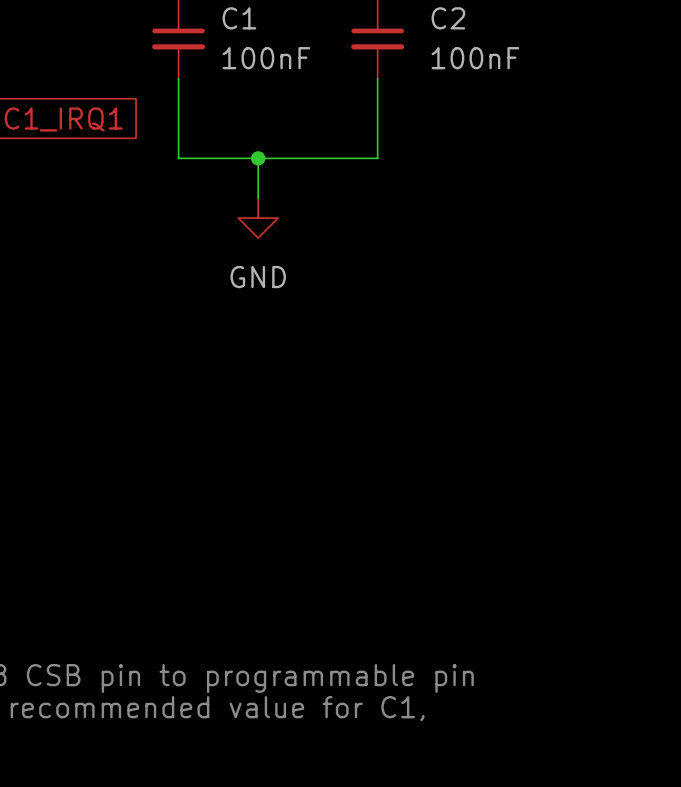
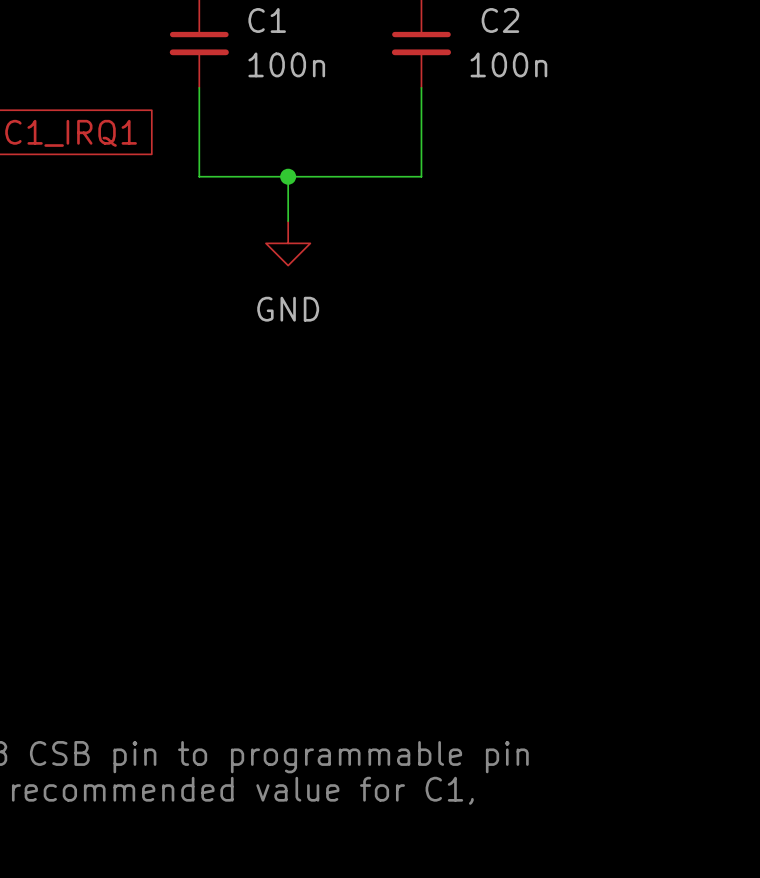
C1 value: 100nF (266, 58) -> 100n (286, 64)
C2 value: 100nF (475, 58) -> 100n (508, 64)

